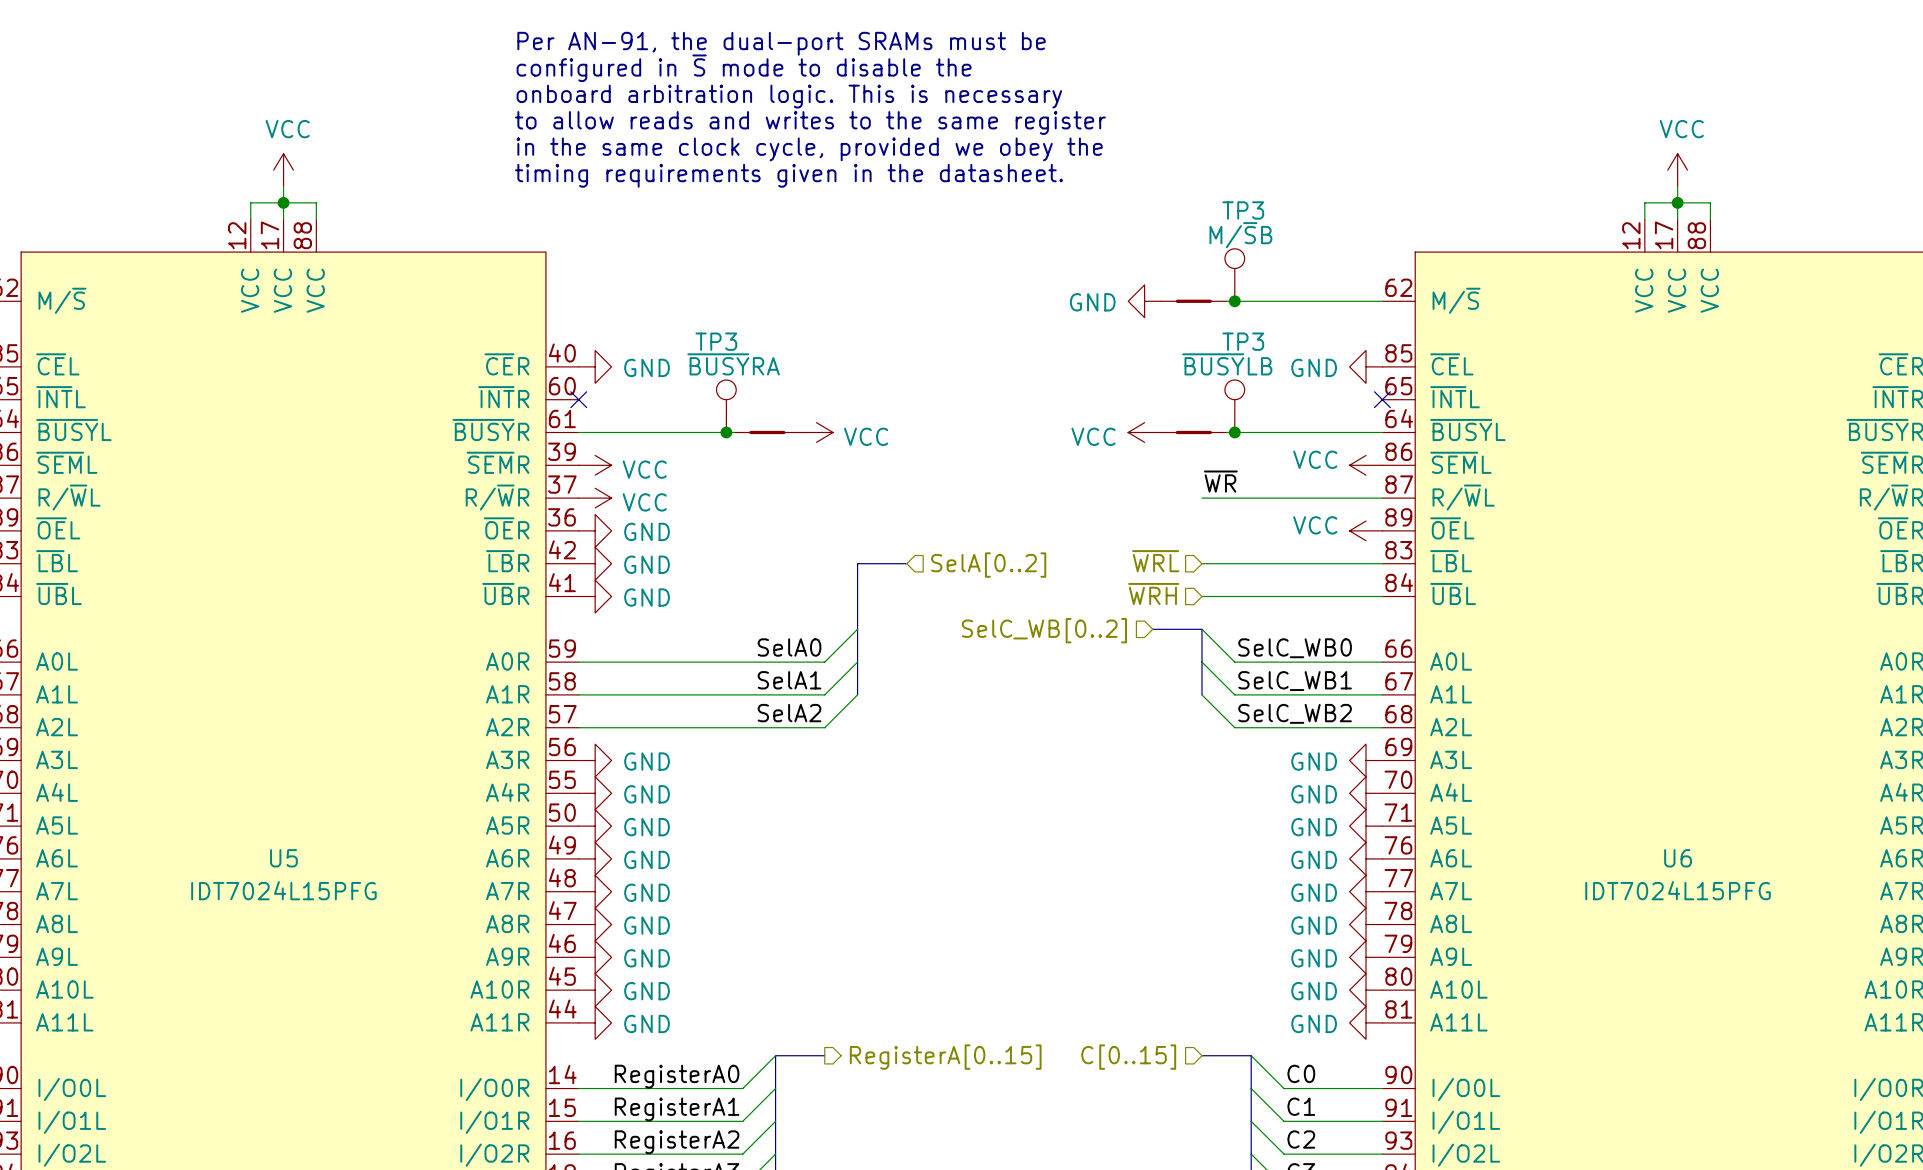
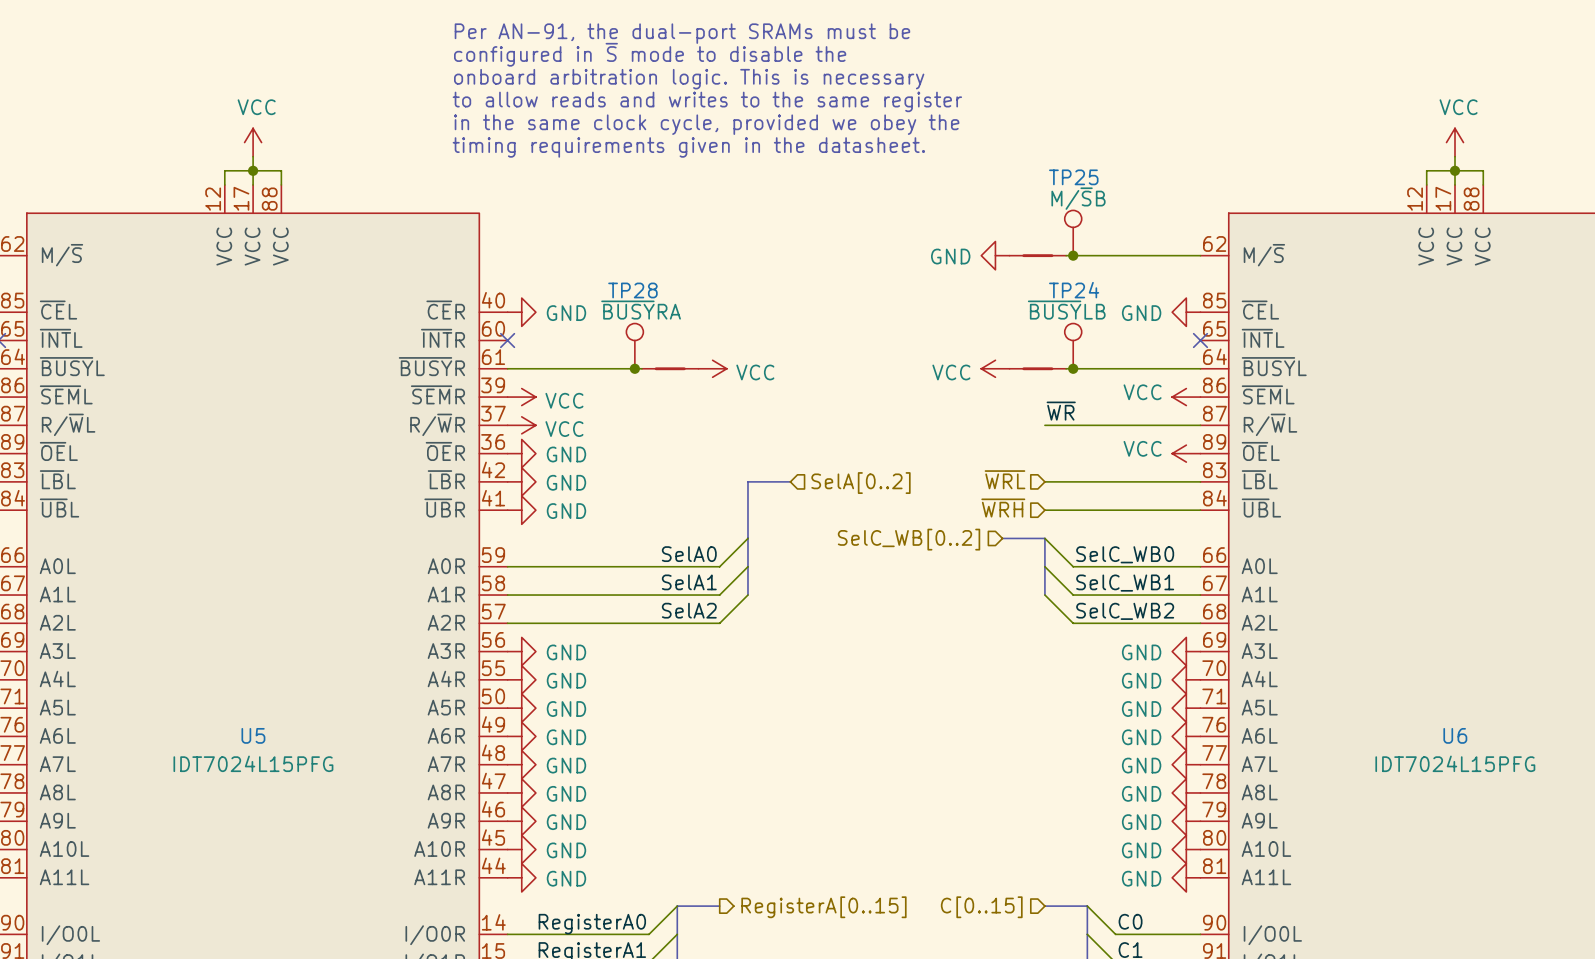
TP3 name: TP3 (1243, 210) -> TP25 (1073, 177)
TP3 name: TP3 (716, 341) -> TP28 (632, 290)
TP3 name: TP3 (1243, 341) -> TP24 (1074, 290)

